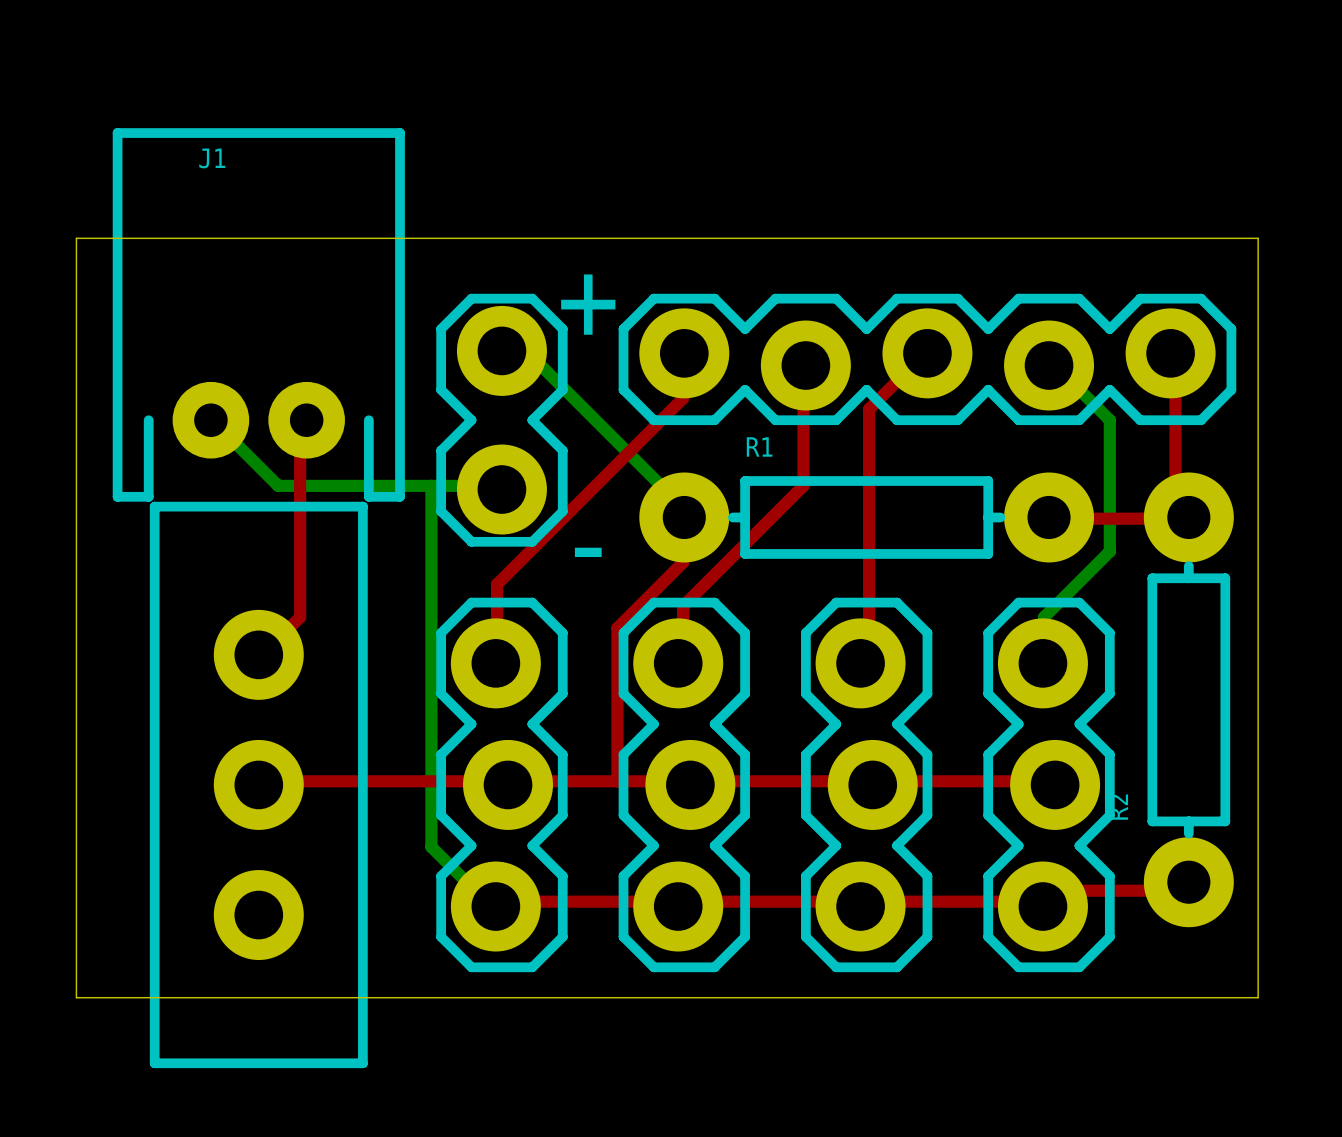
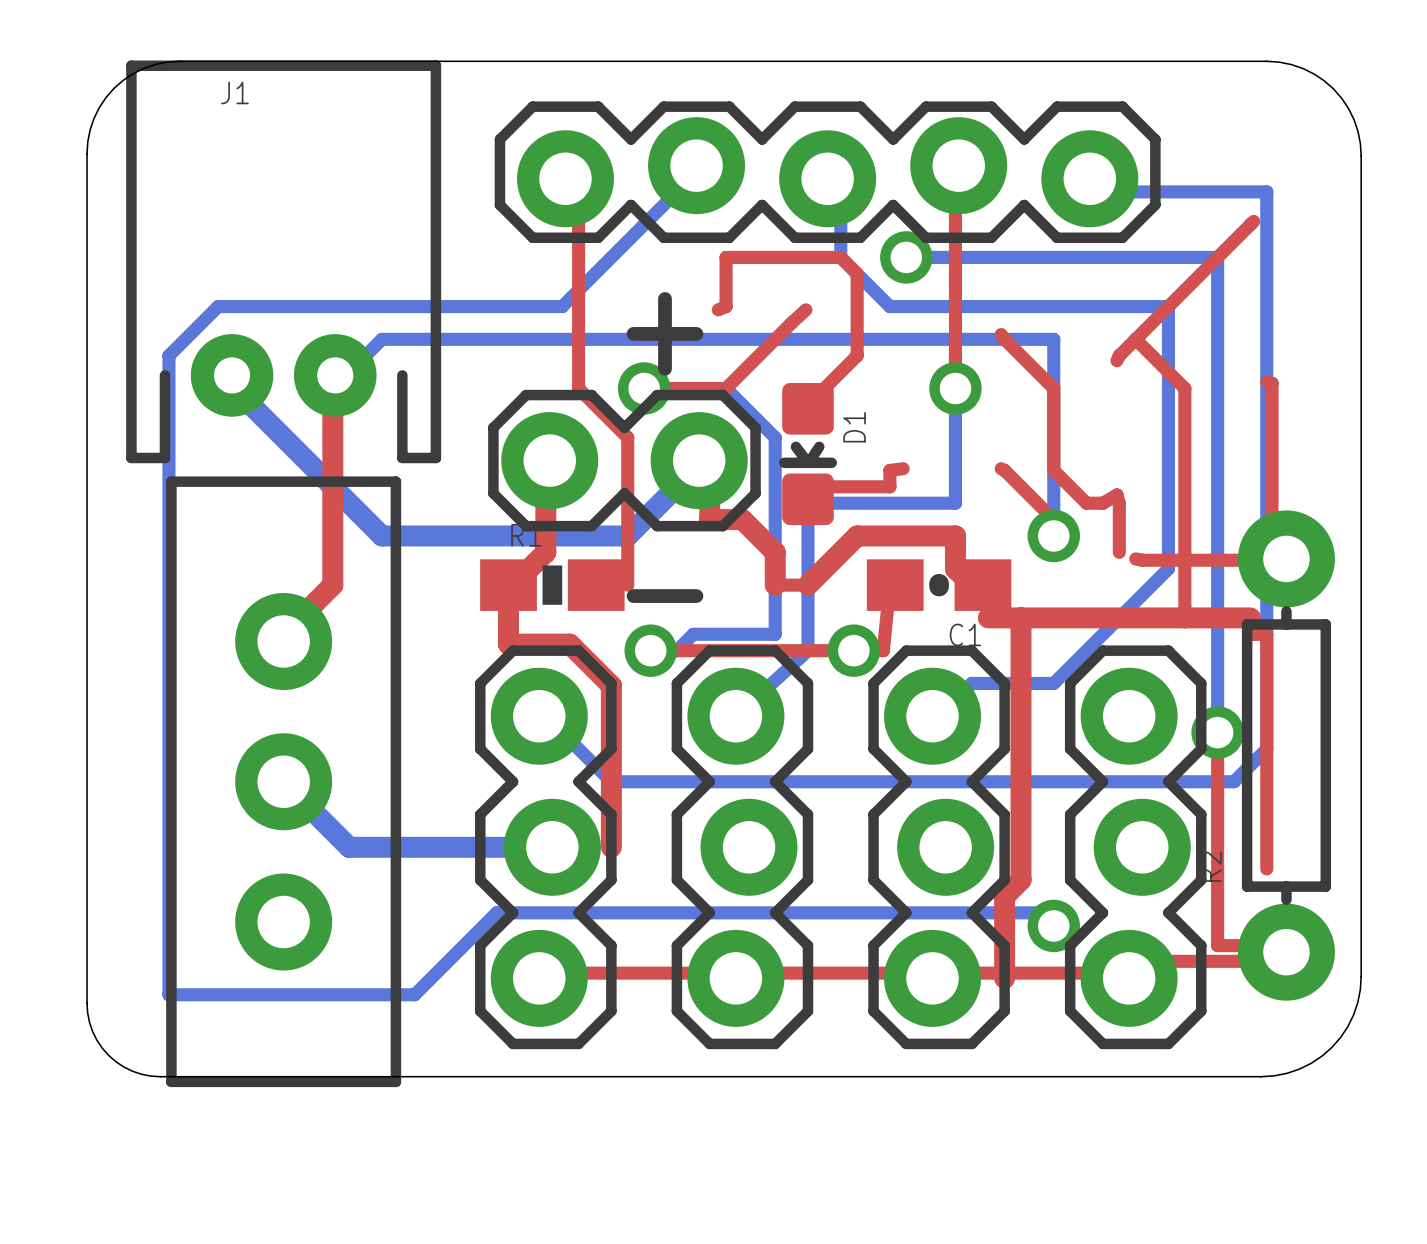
bottom track: none -> (696, 165) (693, 175) (562, 306) (218, 306) (168, 355) (168, 994) (414, 994) (496, 912) (1053, 912) (1053, 925)
top track: none -> (958, 165) (955, 175) (955, 388)
top track: none -> (565, 178) (578, 191) (578, 388) (627, 437) (627, 585)
bottom track: none -> (827, 178) (840, 191) (840, 257) (889, 306) (1168, 306) (1168, 568) (1053, 683) (971, 683) (939, 716) (932, 716)
bottom track: none -> (1089, 178) (1102, 191) (1266, 191) (1266, 748) (1234, 781) (611, 781) (545, 716) (539, 716)
top track: none -> (1253, 221) (1119, 355) (1116, 360)
bottom track: none -> (906, 257) (1217, 257) (1217, 732)
via: none -> (906, 257)
board edge: (76, 238) (1258, 238) -> (87, 257) (87, 153) (87, 141) (94, 118) (106, 97) (123, 80) (144, 68) (167, 62) (179, 61) (1279, 62) (1302, 68) (1324, 80) (1341, 98) (1353, 119) (1360, 143) (1361, 155) (1361, 257)
top track: none -> (718, 309) (726, 306) (726, 257) (840, 257) (857, 273) (857, 355) (807, 404) (807, 408)
top track: none -> (805, 309) (726, 388) (644, 388)
top track: none -> (1001, 334) (1053, 388) (1053, 470) (1086, 503) (1102, 503) (1116, 494) (1119, 503) (1119, 552)
top track: none -> (1135, 339) (1184, 388) (1184, 617)
J1 position: (258, 314) -> (283, 261)
bottom track: none -> (232, 375) (234, 388) (381, 535) (627, 535) (693, 470) (699, 460)
bottom track: none -> (335, 375) (349, 372) (381, 339) (1053, 339) (1053, 535)
top track: none -> (335, 375) (332, 388) (332, 585) (283, 634) (283, 641)
bottom track: (501, 350) (508, 354) (529, 354) (683, 507) (684, 517) -> none
top track: (684, 353) (683, 398) (497, 584) (495, 663) -> none
top track: (927, 353) (923, 354) (869, 409) (869, 660) (860, 663) -> none
bottom track: none -> (644, 388) (726, 388) (775, 437) (775, 634) (693, 634) (676, 650) (650, 650)
via: none -> (644, 388)
bottom track: none -> (955, 388) (955, 503) (824, 503) (807, 519) (807, 650) (735, 716) (742, 716)
via: none -> (955, 388)
part rotation: 0° (927, 359) -> 180° (827, 172)
top track: (805, 365) (803, 365) (803, 485) (683, 606) (683, 660) (678, 663) -> none
bottom track: (1049, 365) (1055, 365) (1109, 420) (1109, 551) (1044, 617) (1042, 663) -> none
bottom track: (210, 420) (278, 485) (497, 485) (501, 489) -> none
top track: (306, 420) (300, 420) (300, 617) (267, 650) (258, 654) -> none
part rotation: 0° (501, 420) -> 90° clockwise (624, 460)
D1: none -> (807, 454)
top track: none -> (549, 460) (545, 470) (545, 552) (513, 585) (508, 585) (508, 644) (569, 644) (611, 685) (611, 847)
top track: none -> (699, 460) (709, 470) (709, 519) (742, 519) (775, 552) (775, 585) (807, 585) (857, 535) (955, 535) (955, 568) (971, 585) (988, 585) (988, 617) (1250, 617) (1253, 634) (1266, 634) (1266, 868)
top track: none -> (903, 468) (889, 470) (889, 486) (807, 486) (807, 499)
top track: none -> (1001, 468) (1053, 519) (1053, 535)
R1 footprint: [639, 472, 1095, 563] -> [480, 559, 625, 611]
bottom track: (431, 485) (431, 846) (486, 901) (495, 906) -> none
via: none -> (1053, 535)
top track: (684, 517) (683, 562) (617, 628) (617, 781) -> none
top track: none -> (895, 585) (889, 585) (883, 650) (650, 650)
C1: none -> (939, 585)
top track: none -> (1021, 617) (1021, 880) (1004, 896) (1004, 978)
via: none -> (650, 650)
via: none -> (853, 650)
top track: none -> (1217, 732) (1217, 945) (1266, 945) (1266, 956)
via: none -> (1217, 732)
bottom track: none -> (283, 781) (349, 847) (552, 847)
top track: (258, 784) (267, 781) (683, 781) (690, 784) (694, 781) (869, 781) (872, 784) (880, 781) (1055, 781) (1055, 784) -> none
part position: (258, 784) -> (283, 781)
via: none -> (1053, 925)
board edge: (1258, 905) (1258, 997) (1165, 997) -> (1361, 976) (1357, 1002) (1353, 1015) (1347, 1026) (1331, 1047) (1311, 1063) (1299, 1069) (1287, 1073) (1261, 1076)
board edge: (76, 929) (76, 997) (144, 997) -> (87, 1003) (92, 1031) (108, 1055) (132, 1071) (160, 1076)

